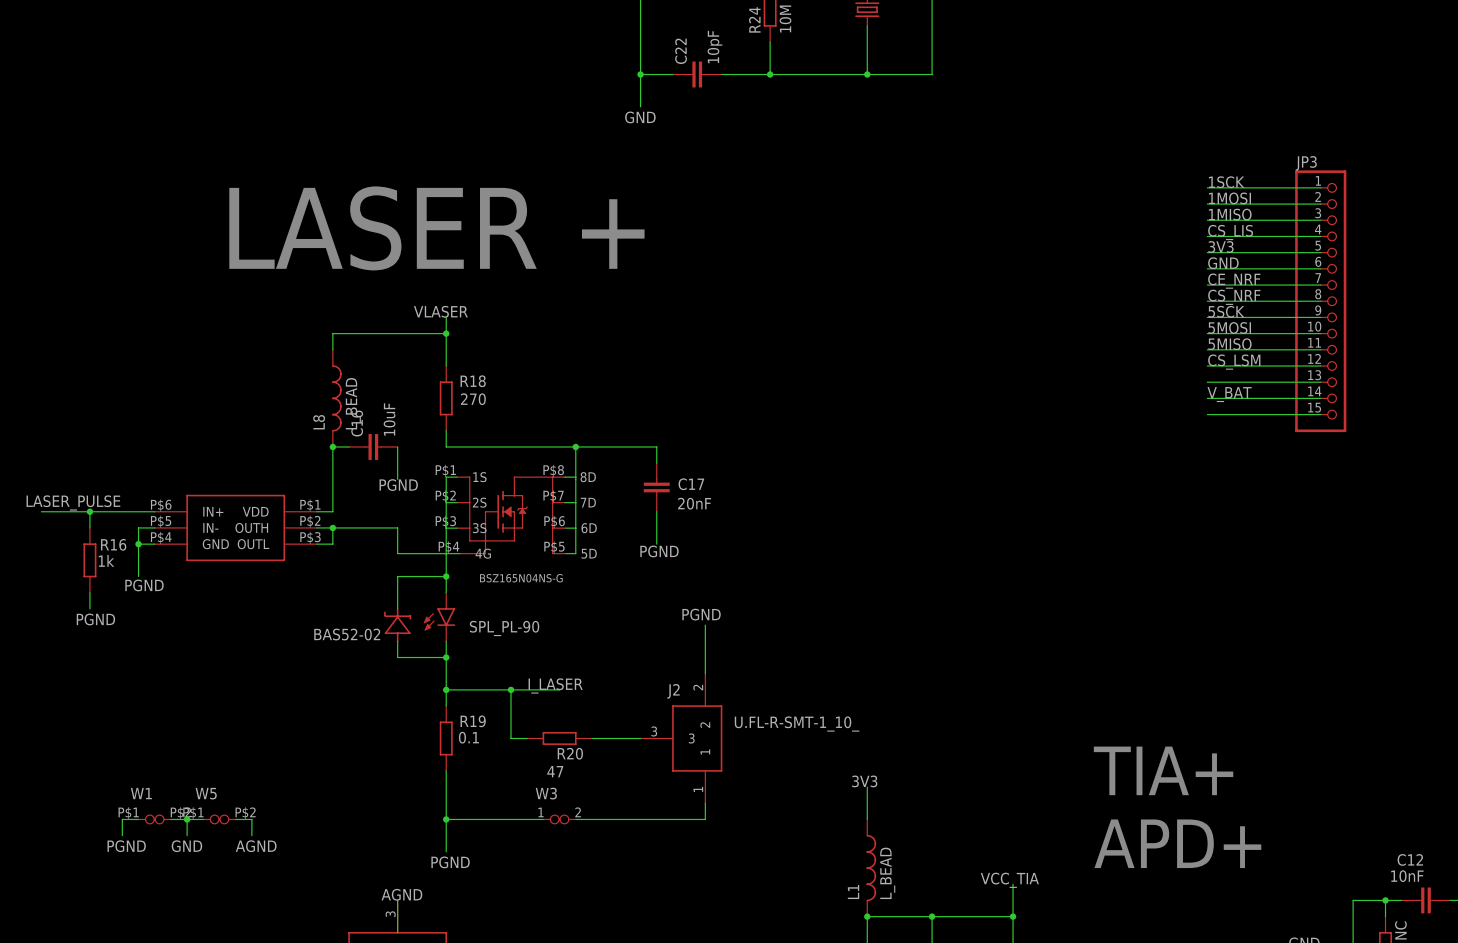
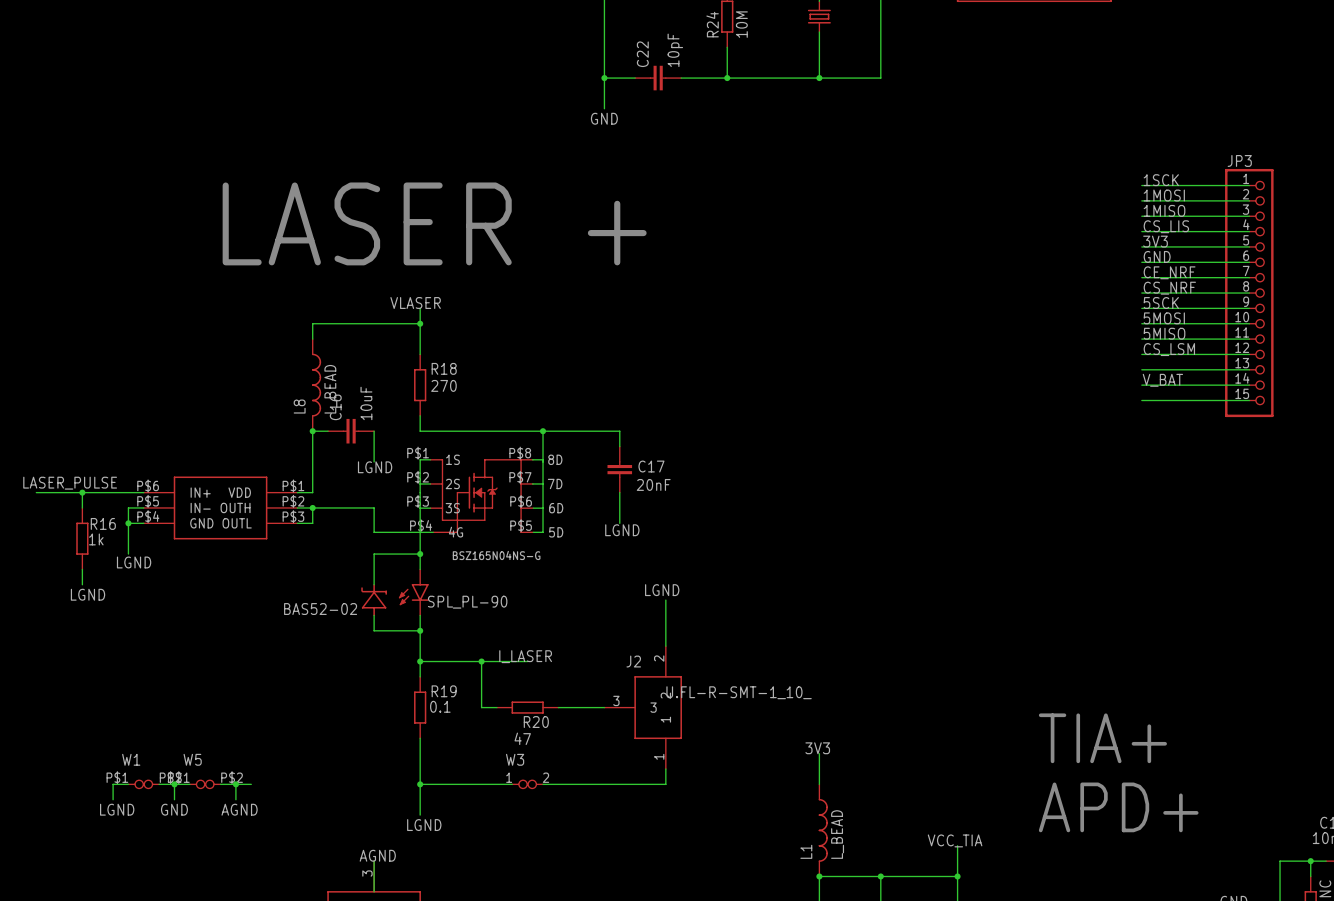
label: PGND (398, 485) -> LGND (375, 467)
label: PGND (659, 551) -> LGND (622, 530)
label: PGND (144, 585) -> LGND (134, 562)
label: PGND (701, 614) -> LGND (662, 590)
label: PGND (95, 619) -> LGND (88, 594)
wire: none -> (235, 784) (251, 784)
junction: none -> (235, 784)
label: PGND (126, 846) -> LGND (117, 809)
label: PGND (450, 862) -> LGND (424, 825)

